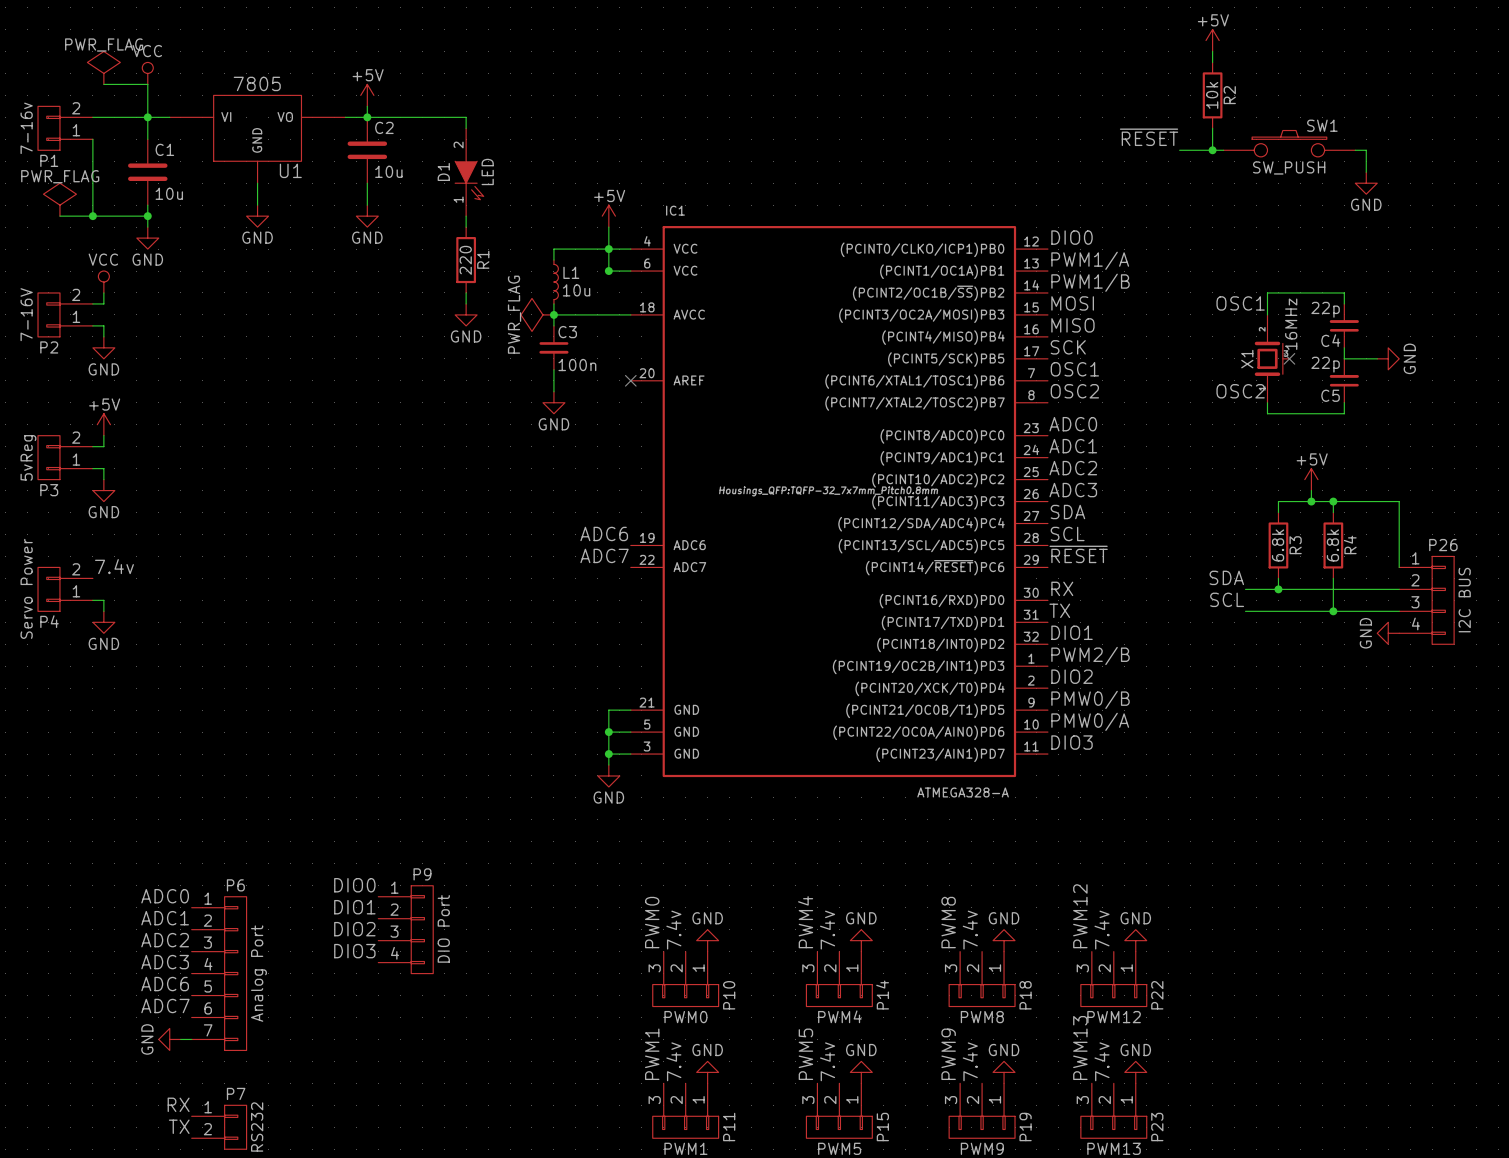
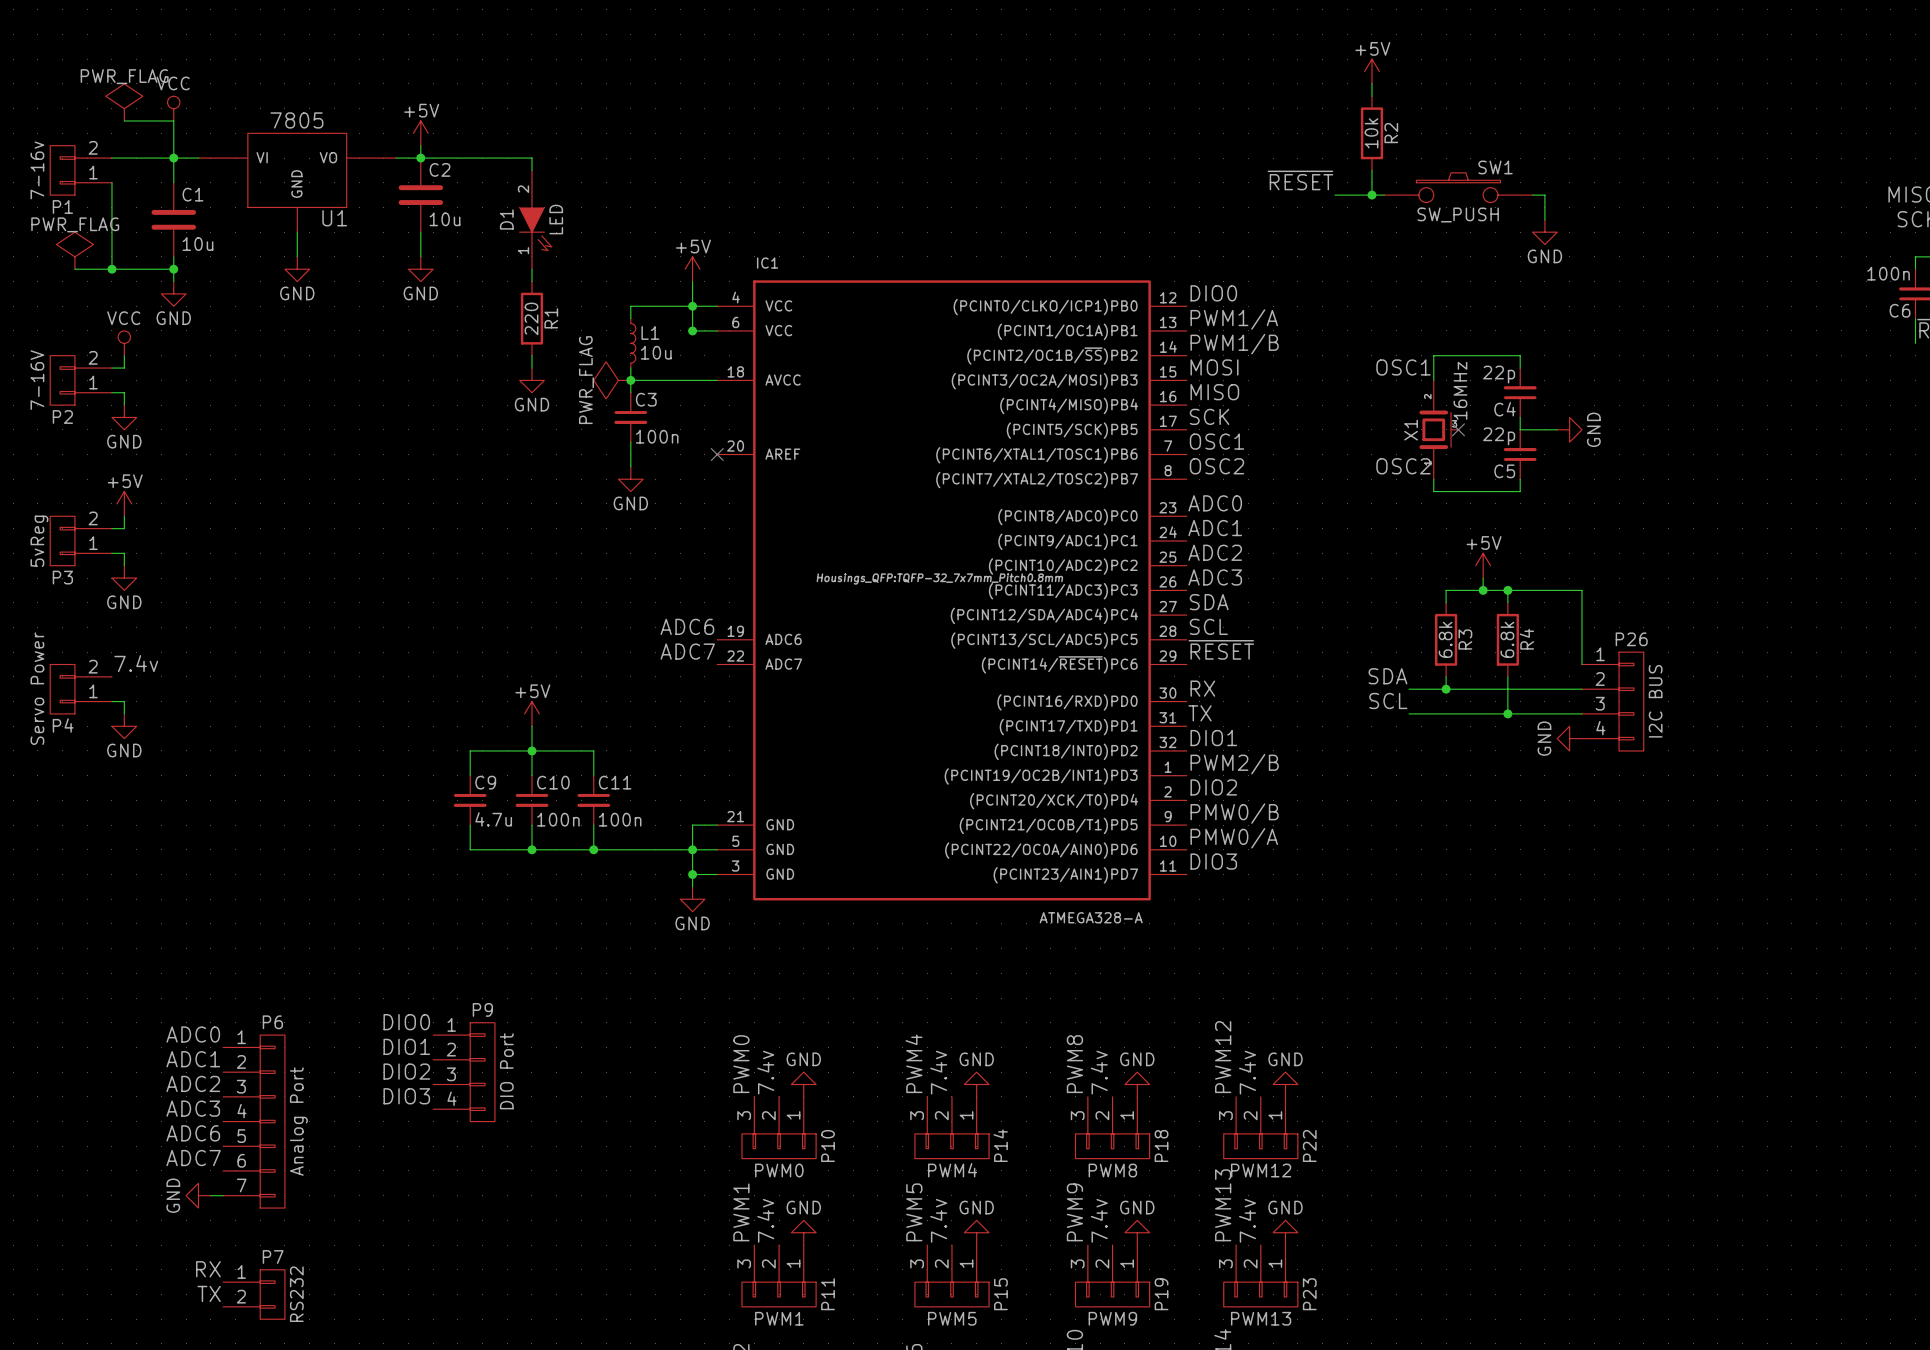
power symbol: none -> +5V (531, 713)
wire: none -> (531, 726) (531, 775)
junction: none -> (531, 750)
wire: none -> (470, 775) (470, 750) (593, 750) (593, 775)
C9: none -> 4.7u (470, 800)
C10: none -> 100n (531, 800)
C11: none -> 100n (593, 800)
wire: none -> (470, 825) (470, 849) (692, 849)
wire: none -> (531, 825) (531, 849)
wire: none -> (593, 825) (593, 849)
junction: none -> (531, 849)
junction: none -> (593, 849)

